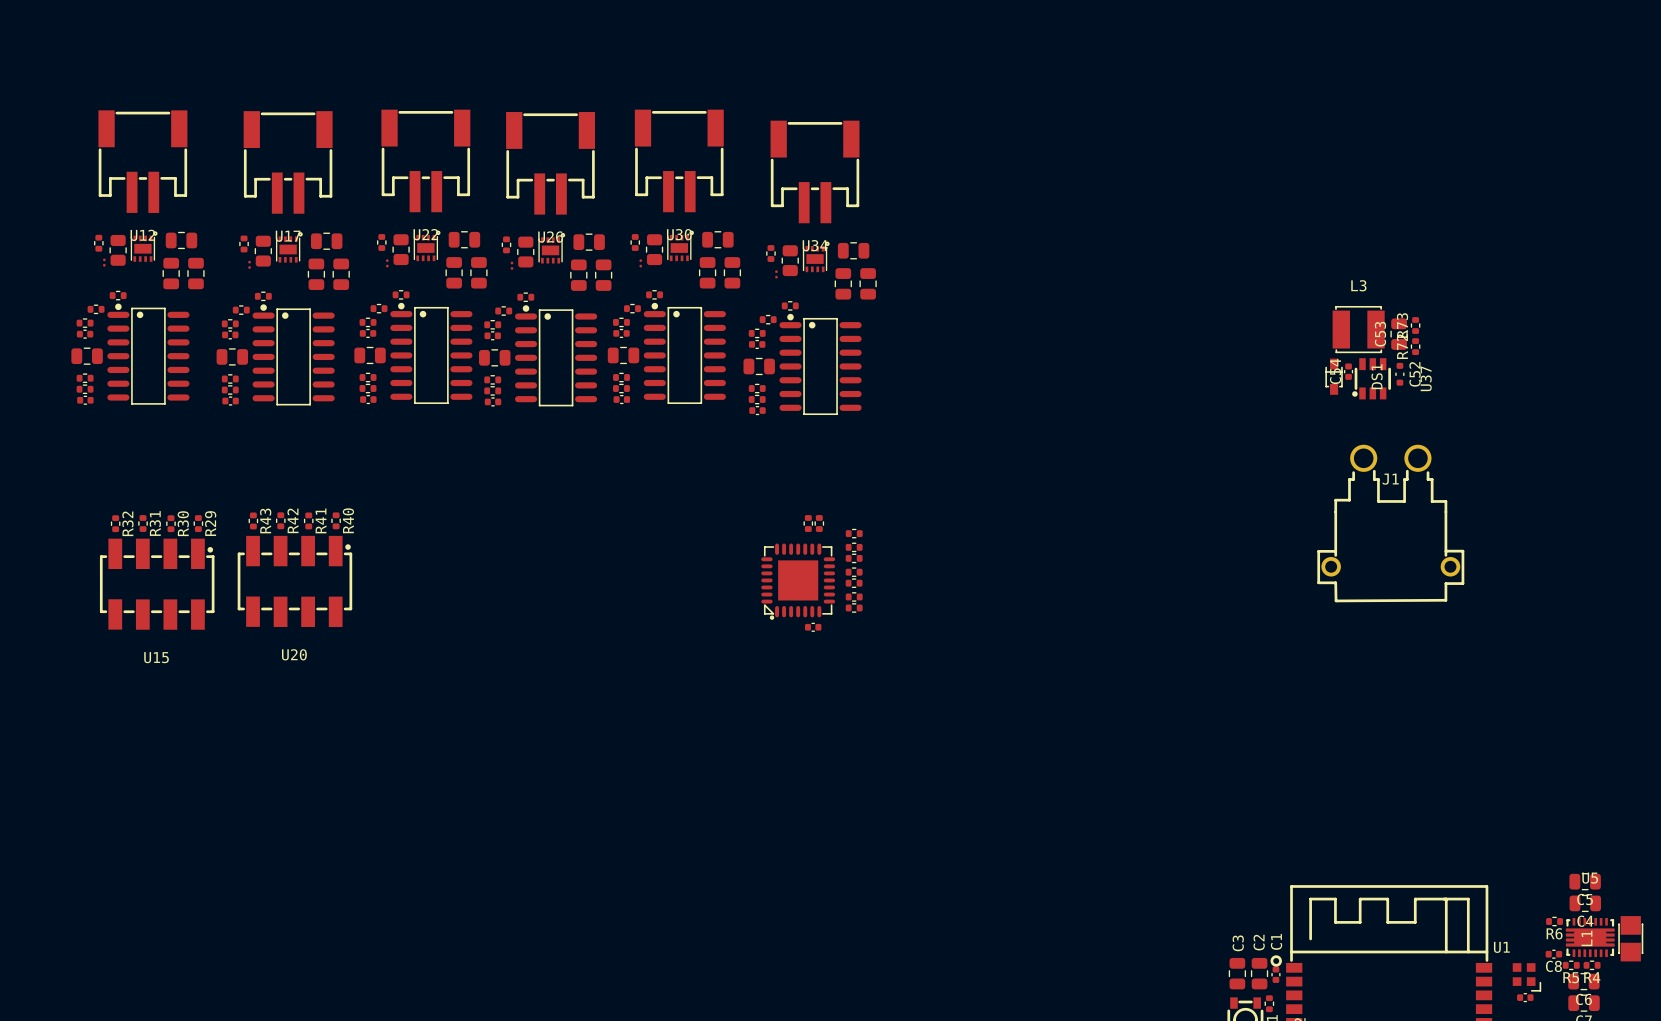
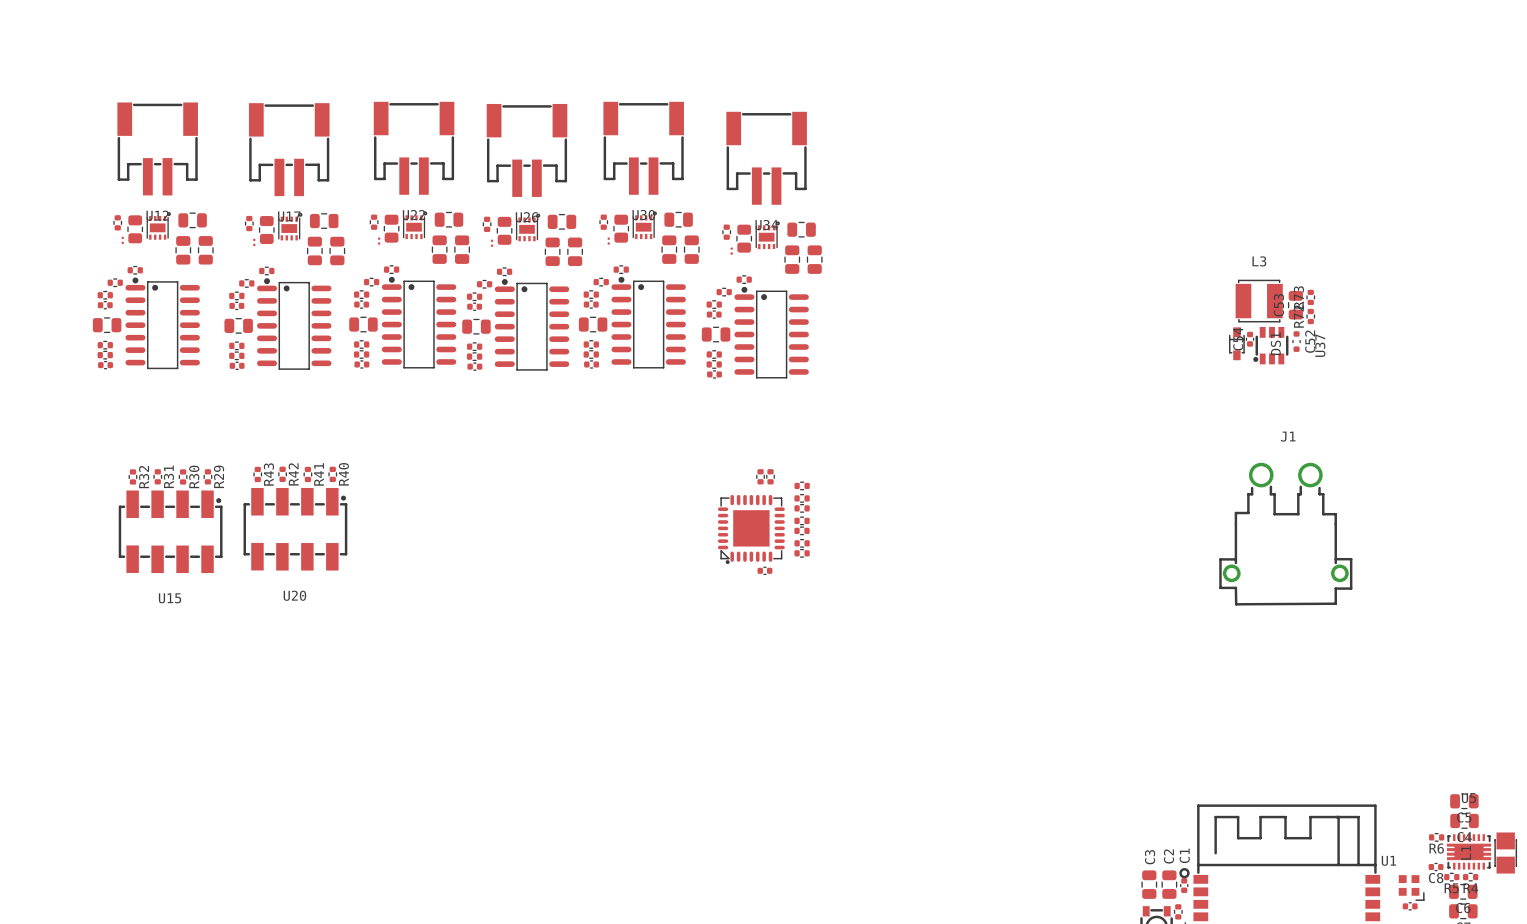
J1 position: (1390, 523) -> (1285, 534)

